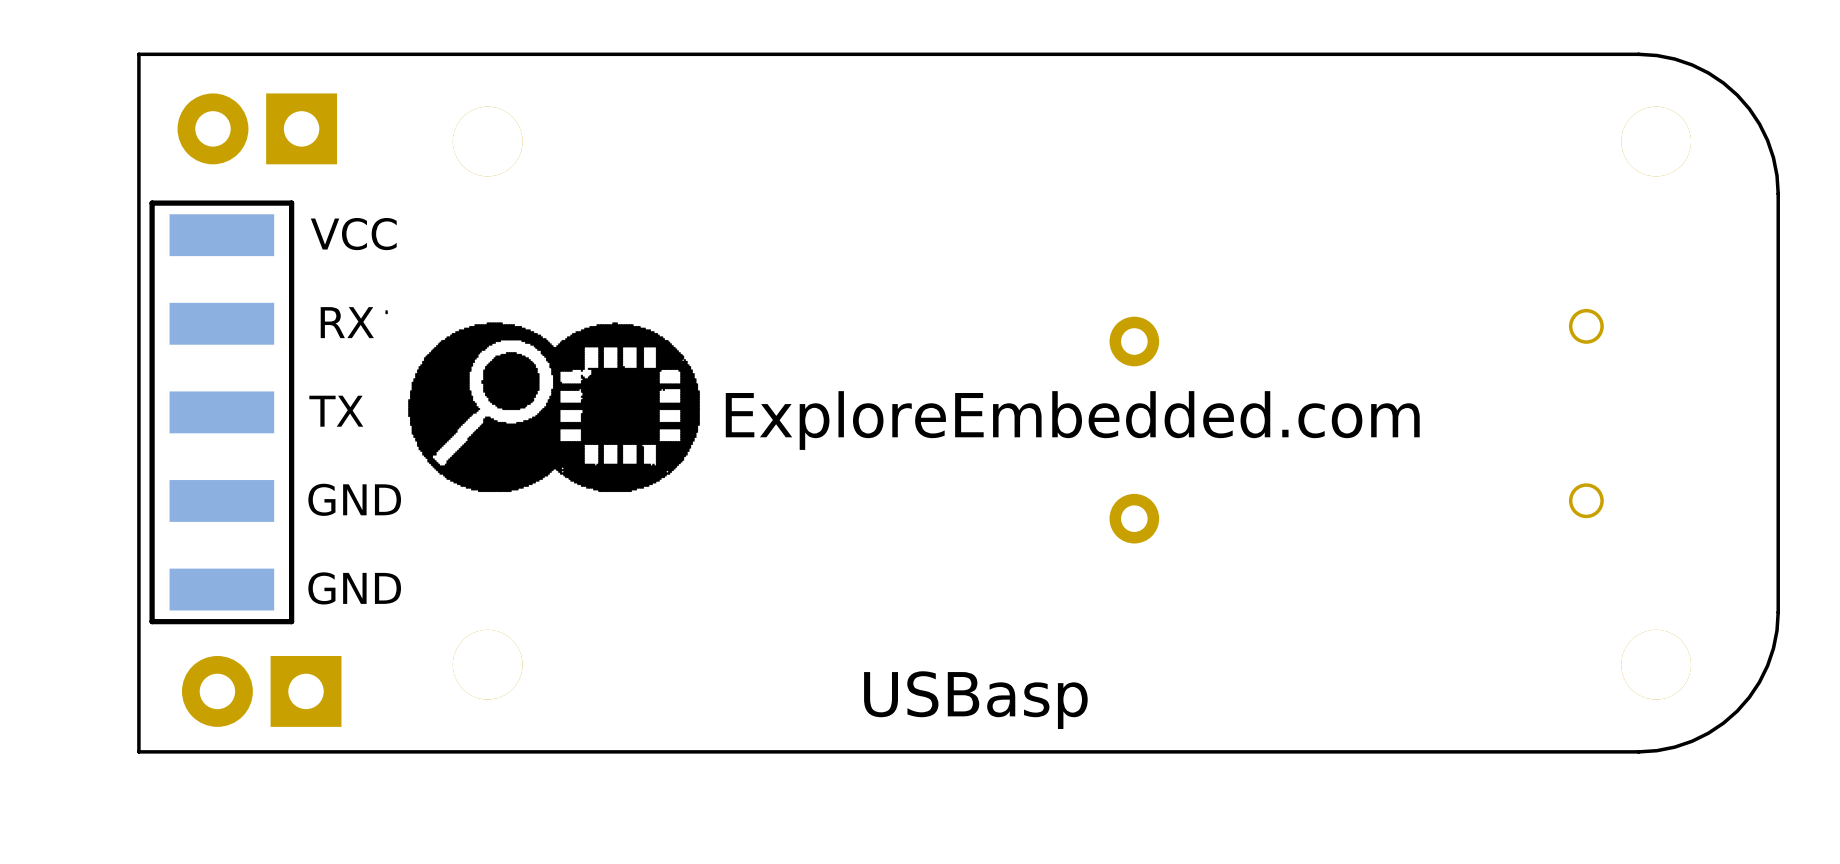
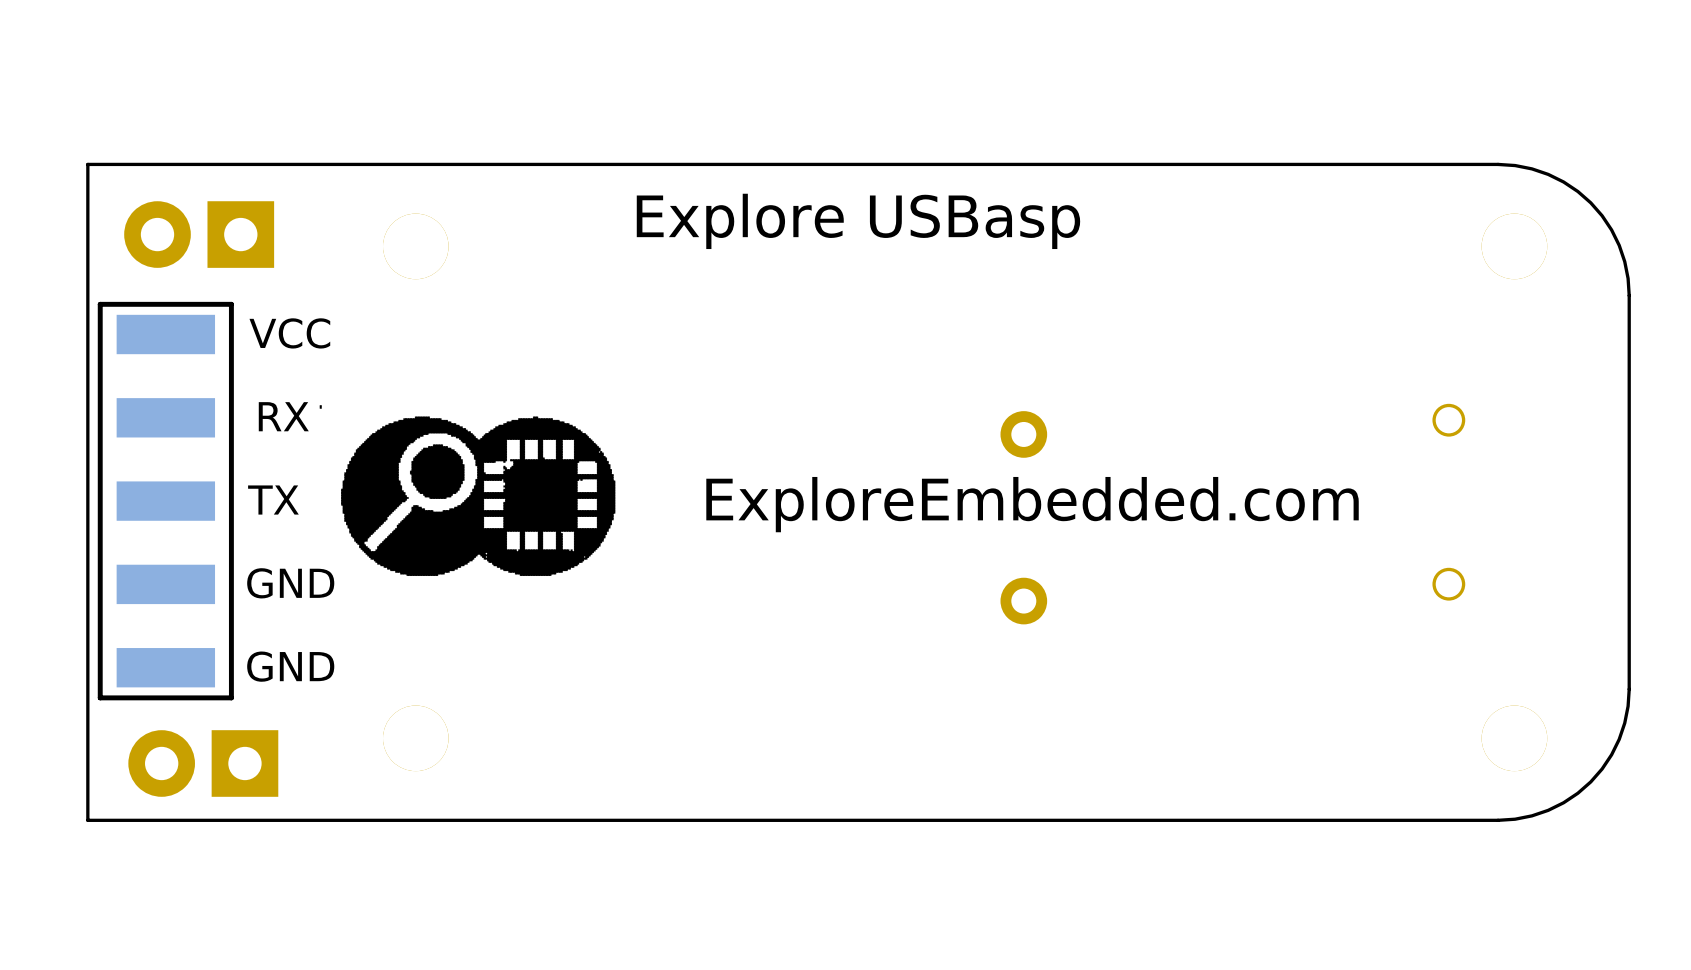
text: none -> Explore USBasp (858, 221)
text position: ExploreEmbedded.com (1072, 420) -> ExploreEmbedded.com (1032, 504)
text: USBasp (975, 700) -> none

